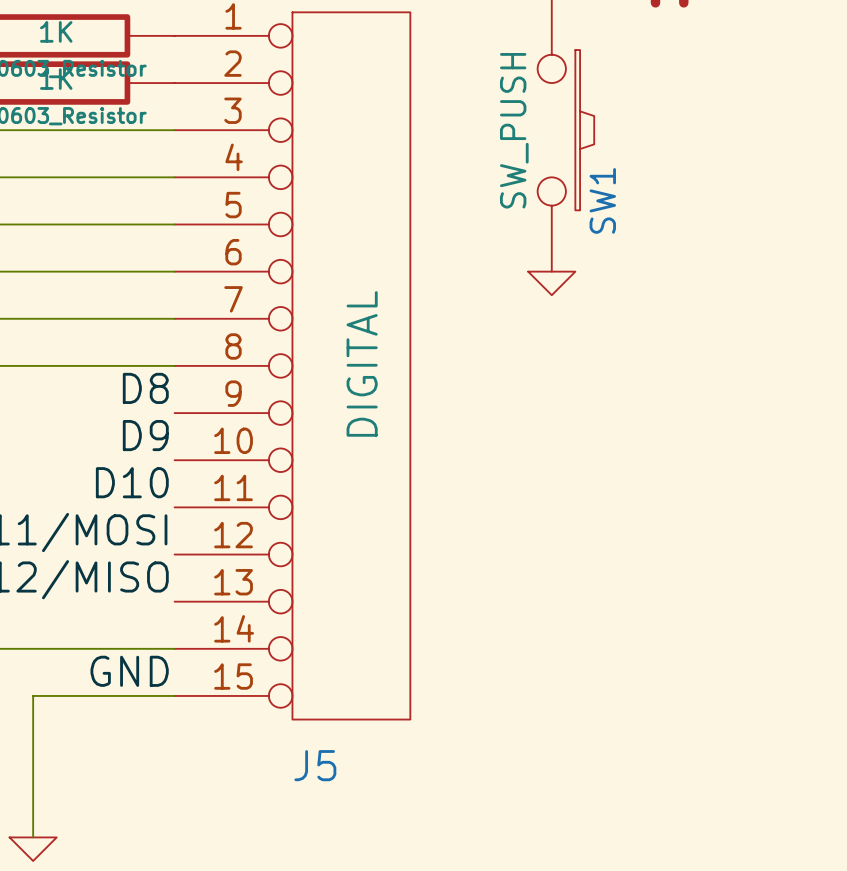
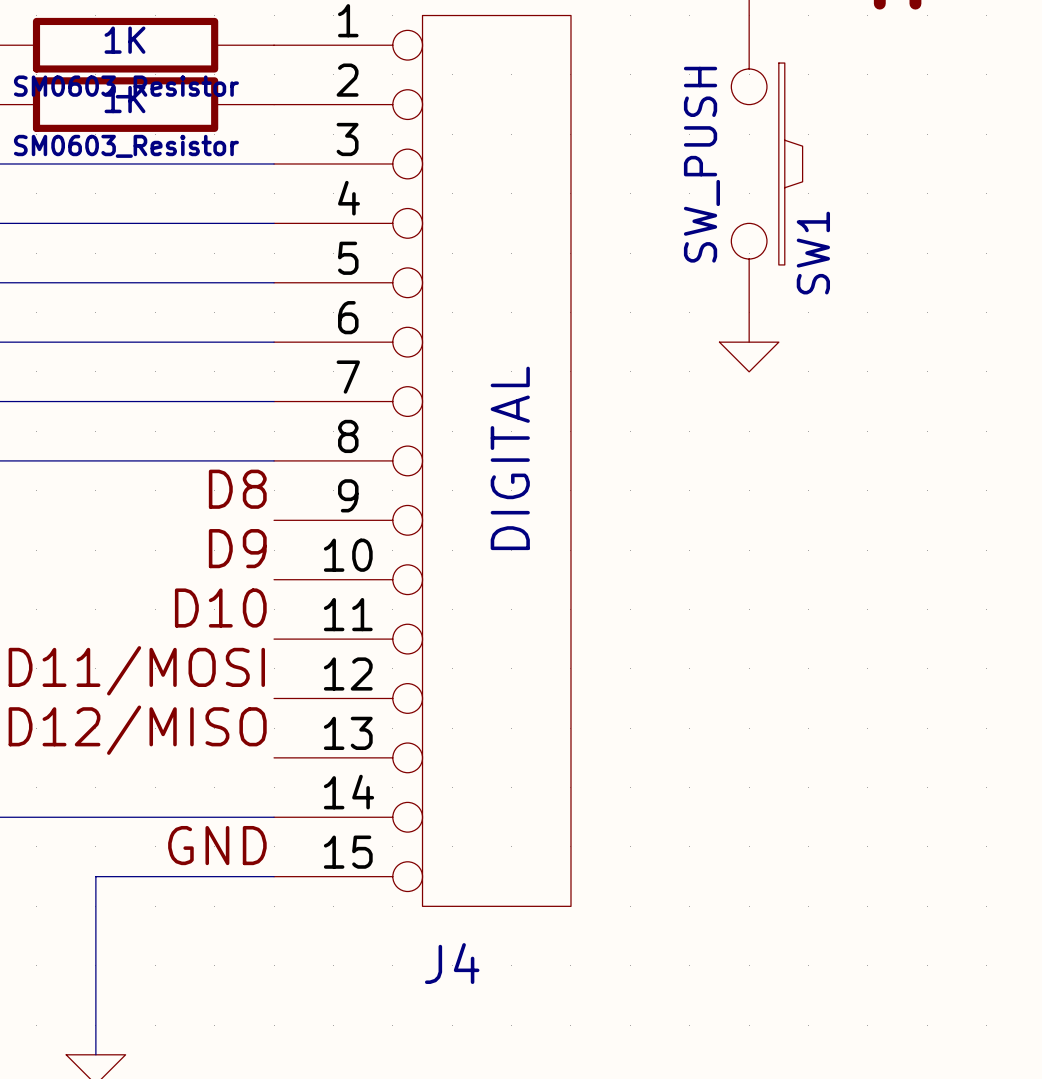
J5 name: J5 (315, 765) -> J4 (452, 963)

